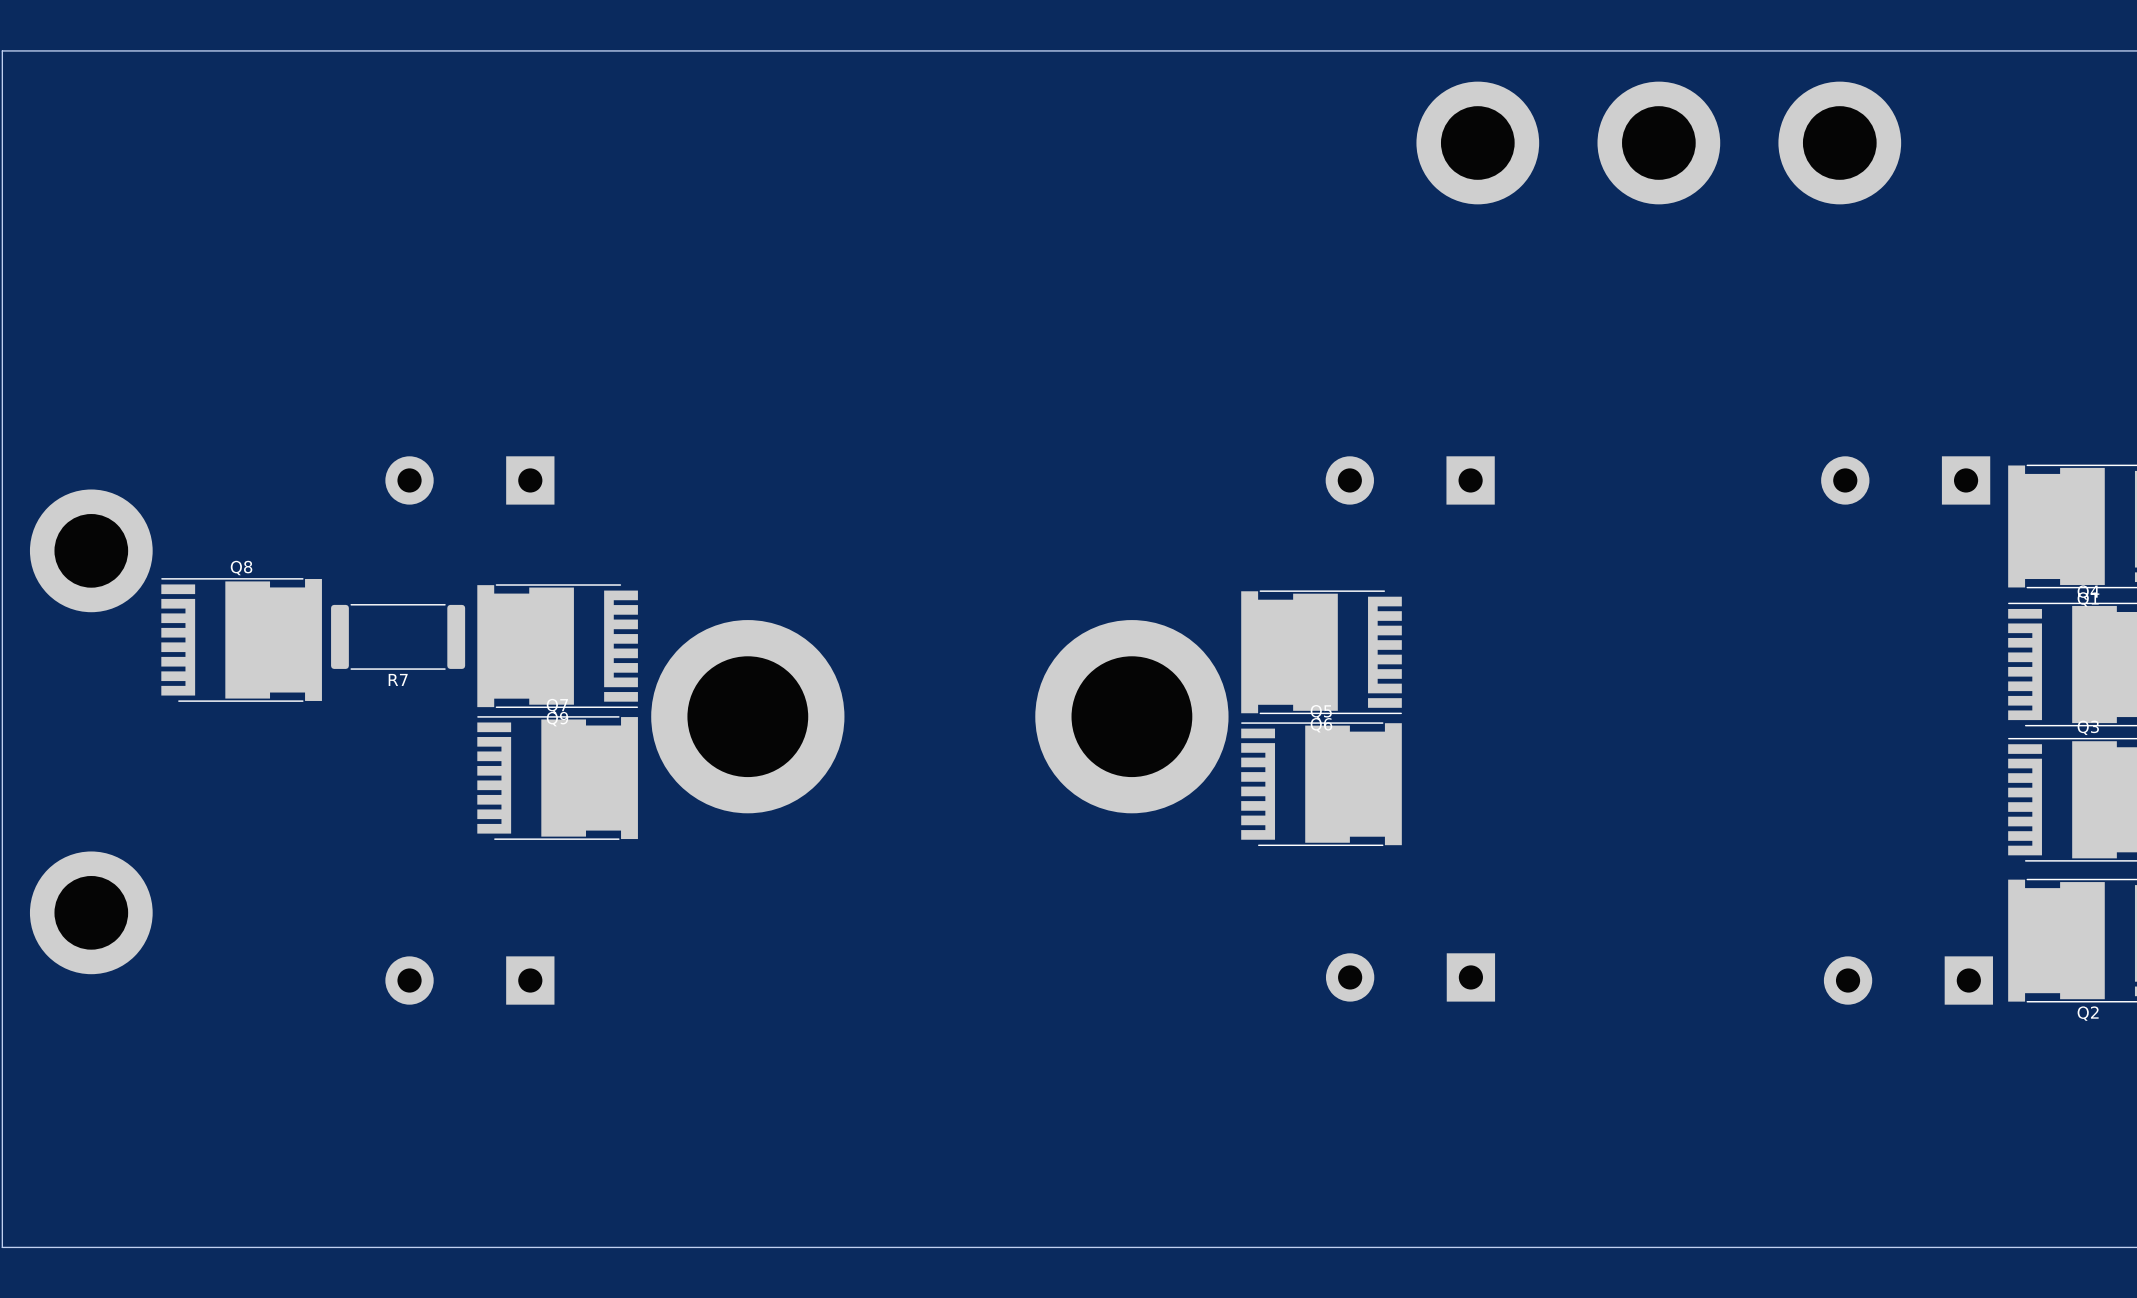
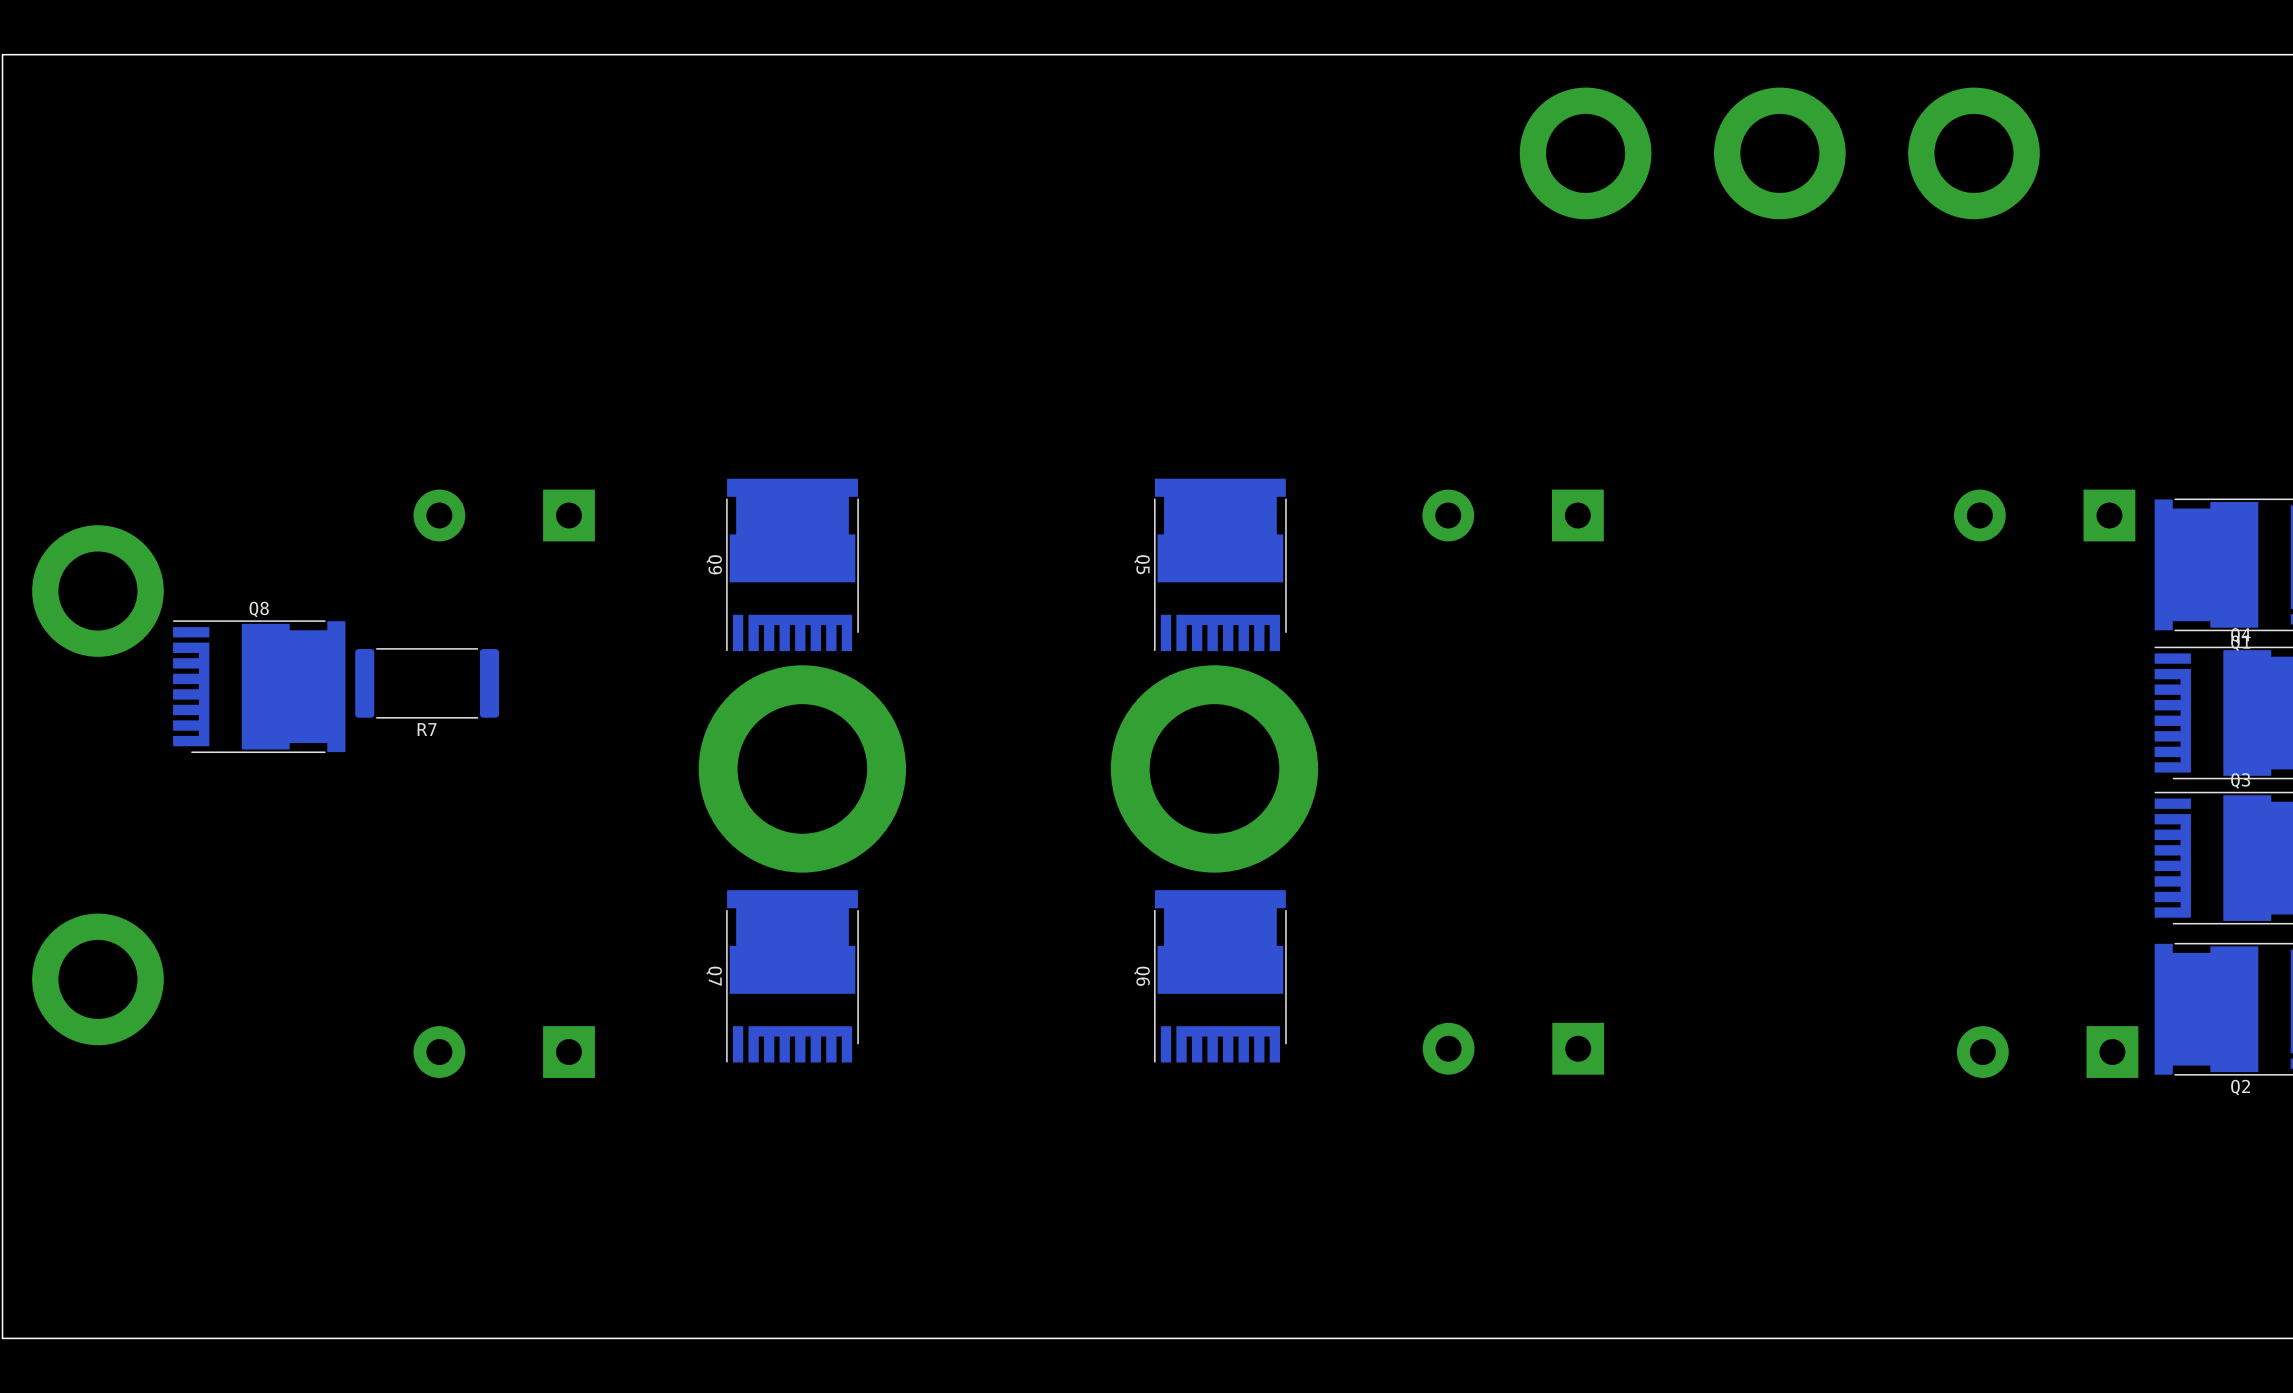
Q9 rotation: 0° (557, 646) -> 90° clockwise (792, 564)
Q9 position: (557, 646) -> (792, 564)
Q6 rotation: 0° (1321, 652) -> 90° clockwise (1220, 976)
Q6 position: (1321, 652) -> (1220, 976)
Q7 rotation: 0° (557, 778) -> 90° counterclockwise (792, 976)
Q7 position: (557, 778) -> (792, 976)
Q5 rotation: 0° (1321, 784) -> 90° counterclockwise (1220, 564)
Q5 position: (1321, 784) -> (1220, 564)

